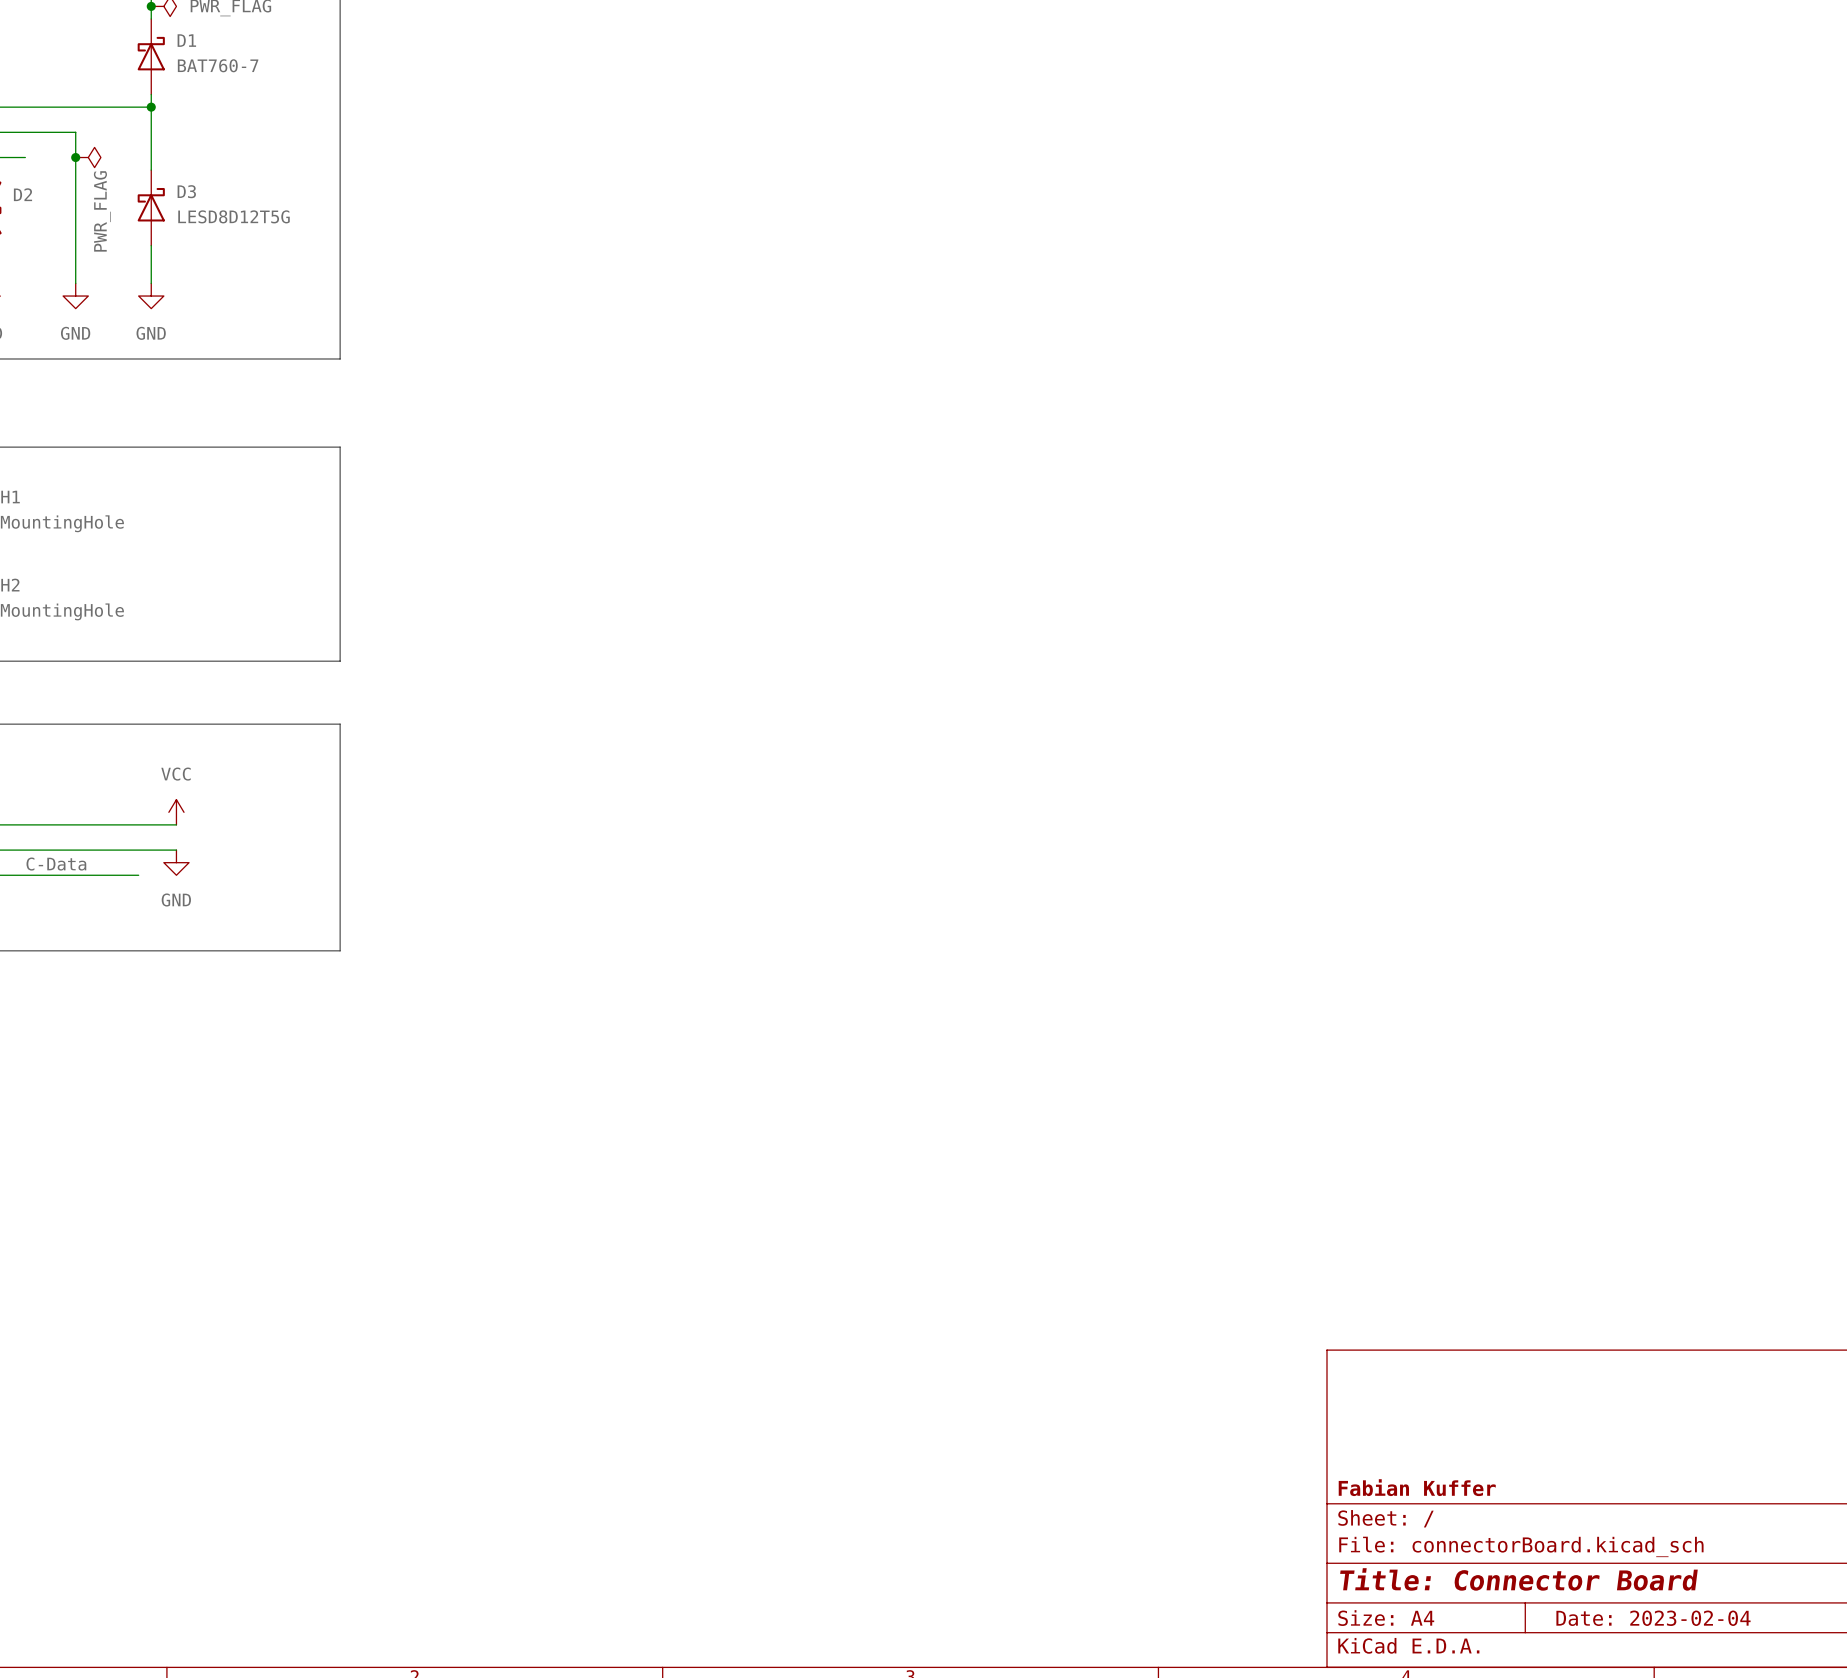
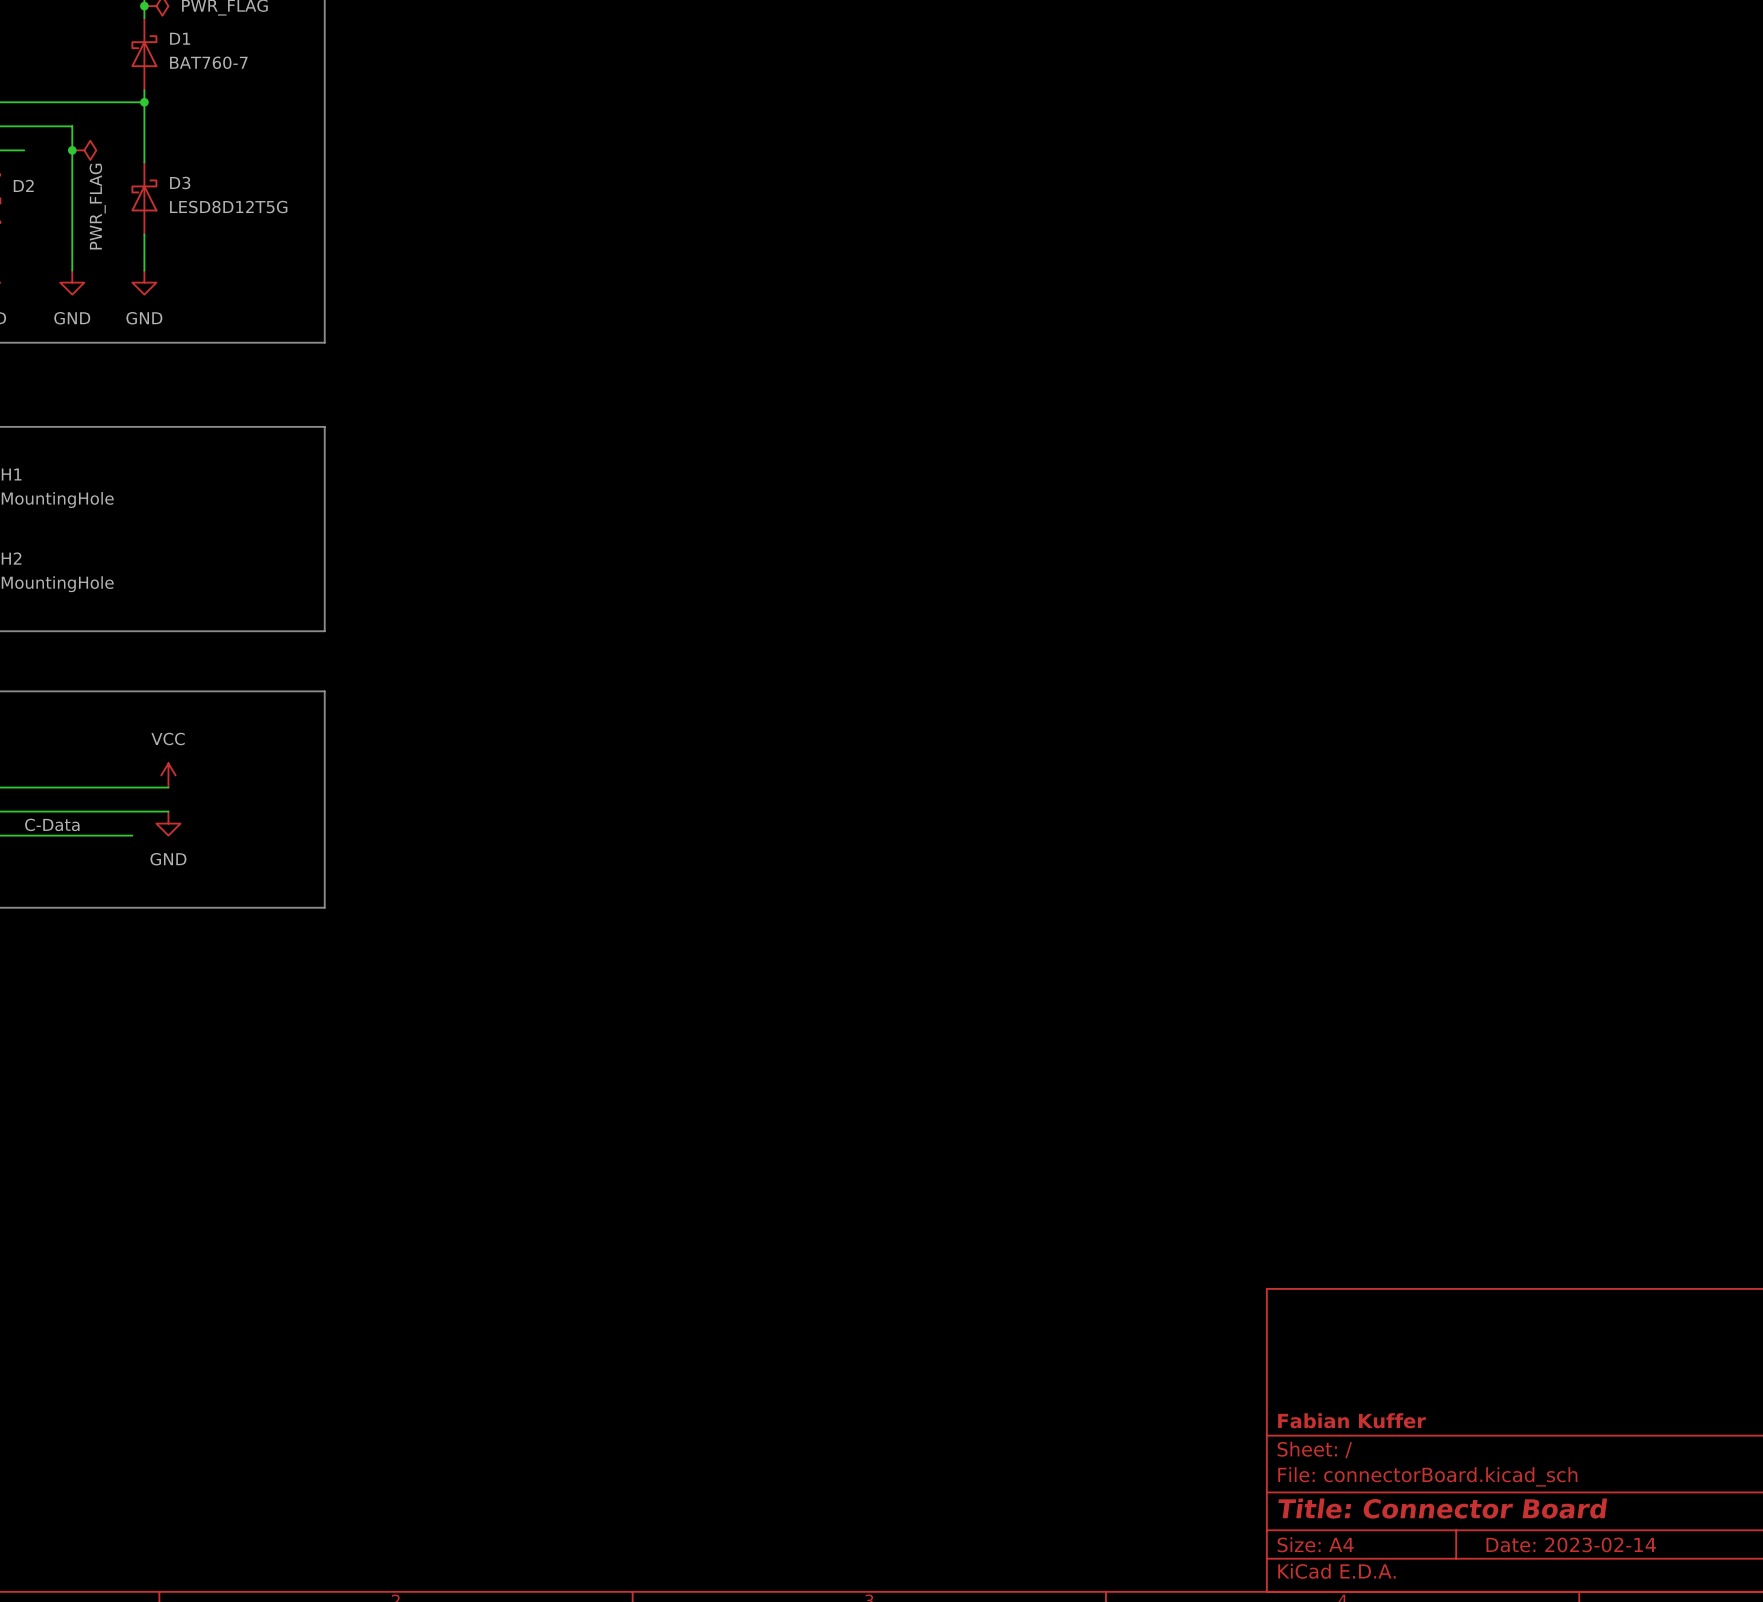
title block: Date: 2023-02-04 (1653, 1618) -> Date: 2023-02-14 (1571, 1544)

